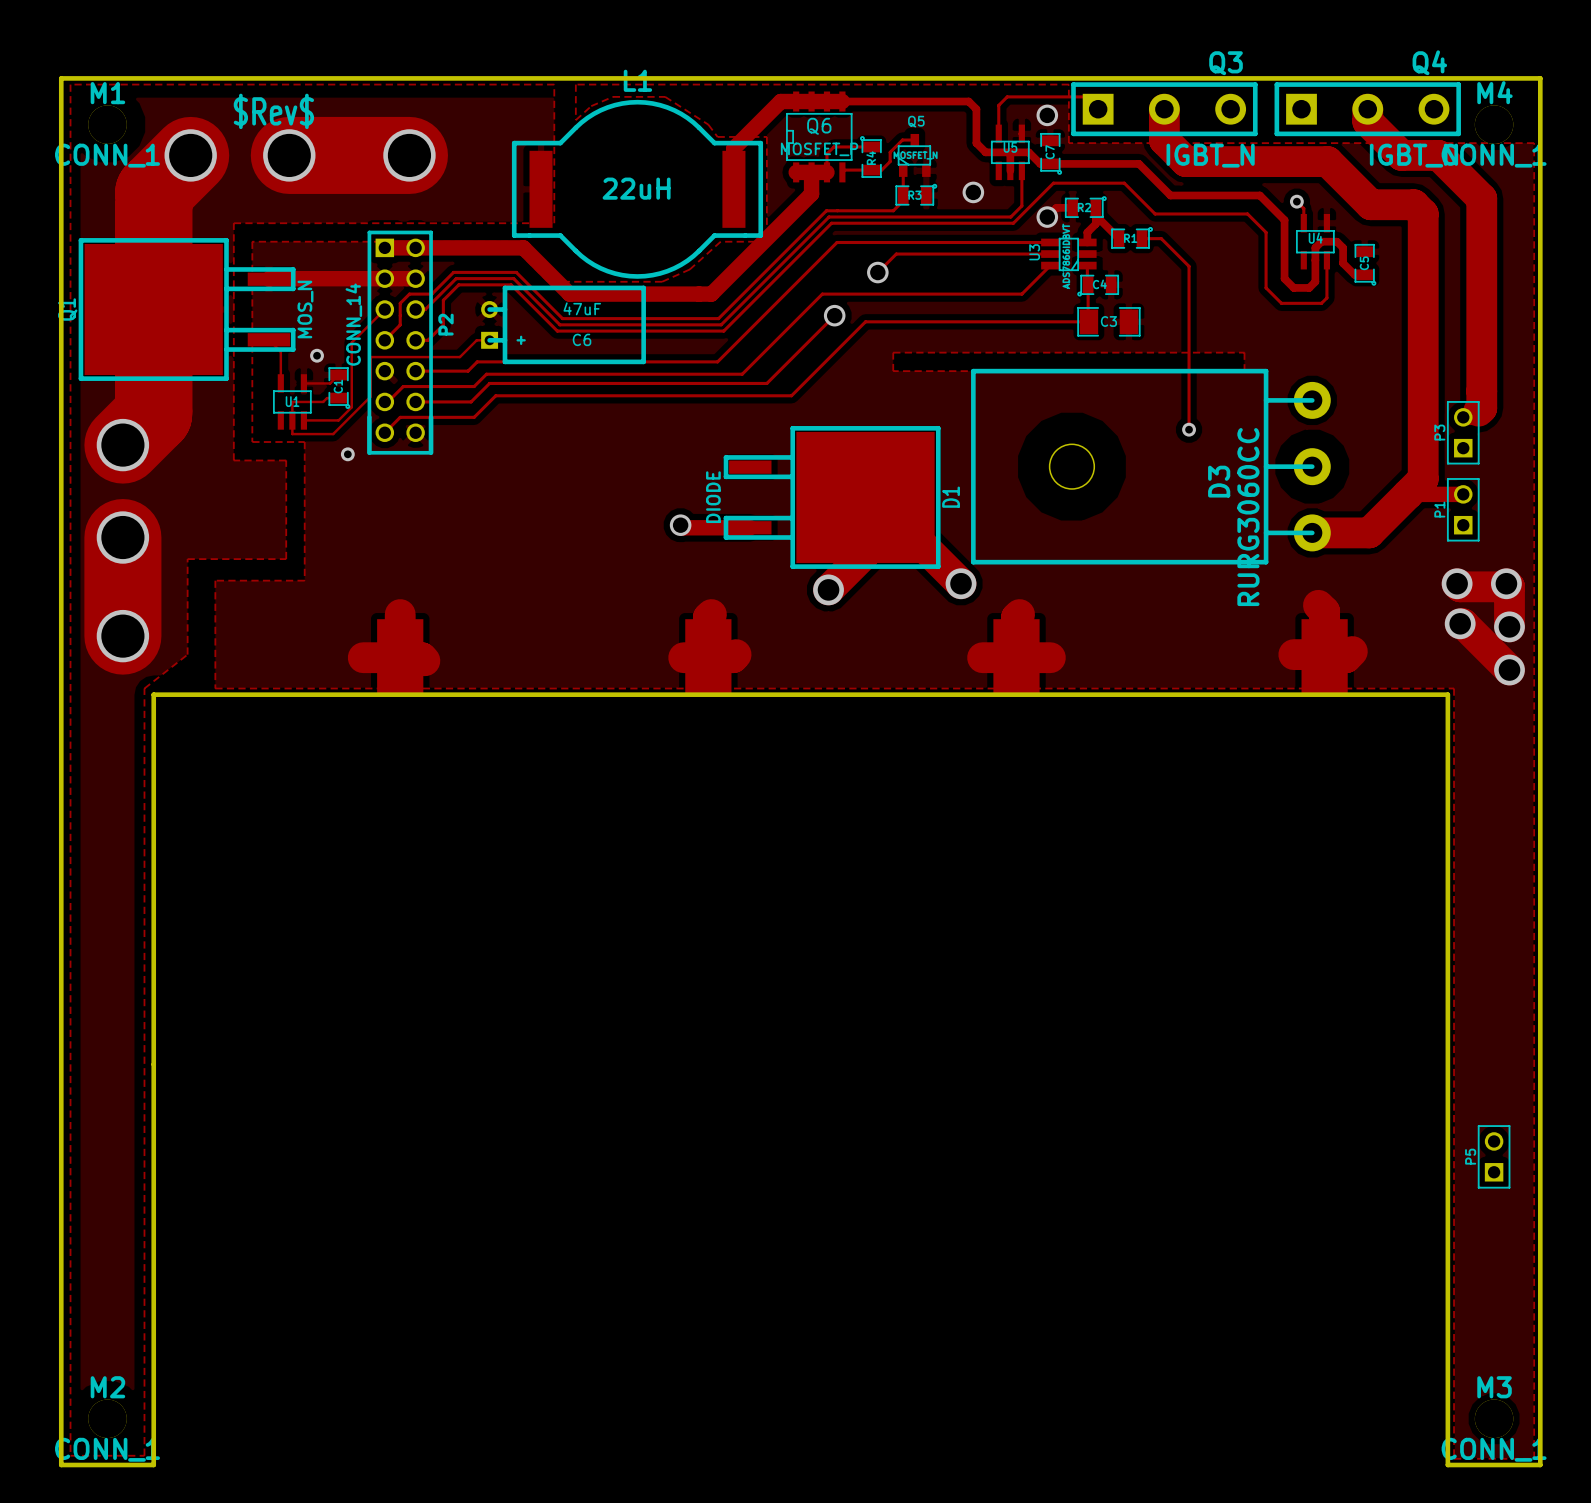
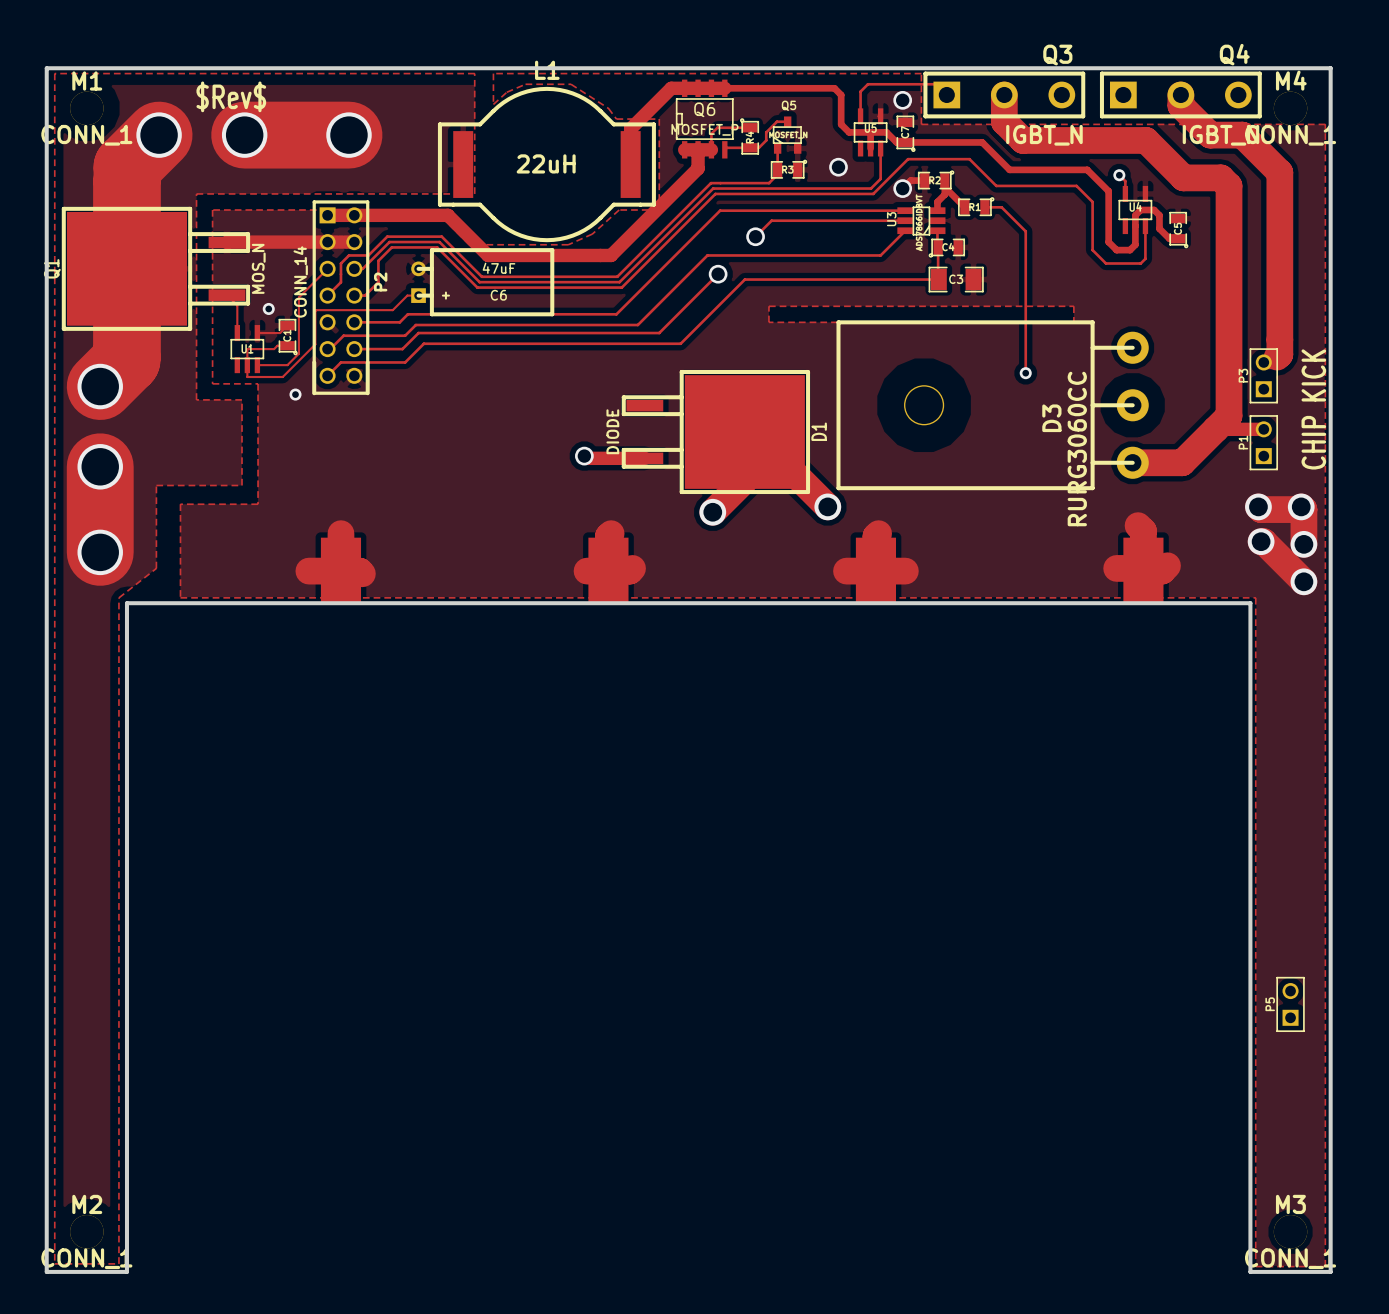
text: none -> KICK (1313, 375)
text: none -> CHIP (1313, 442)

